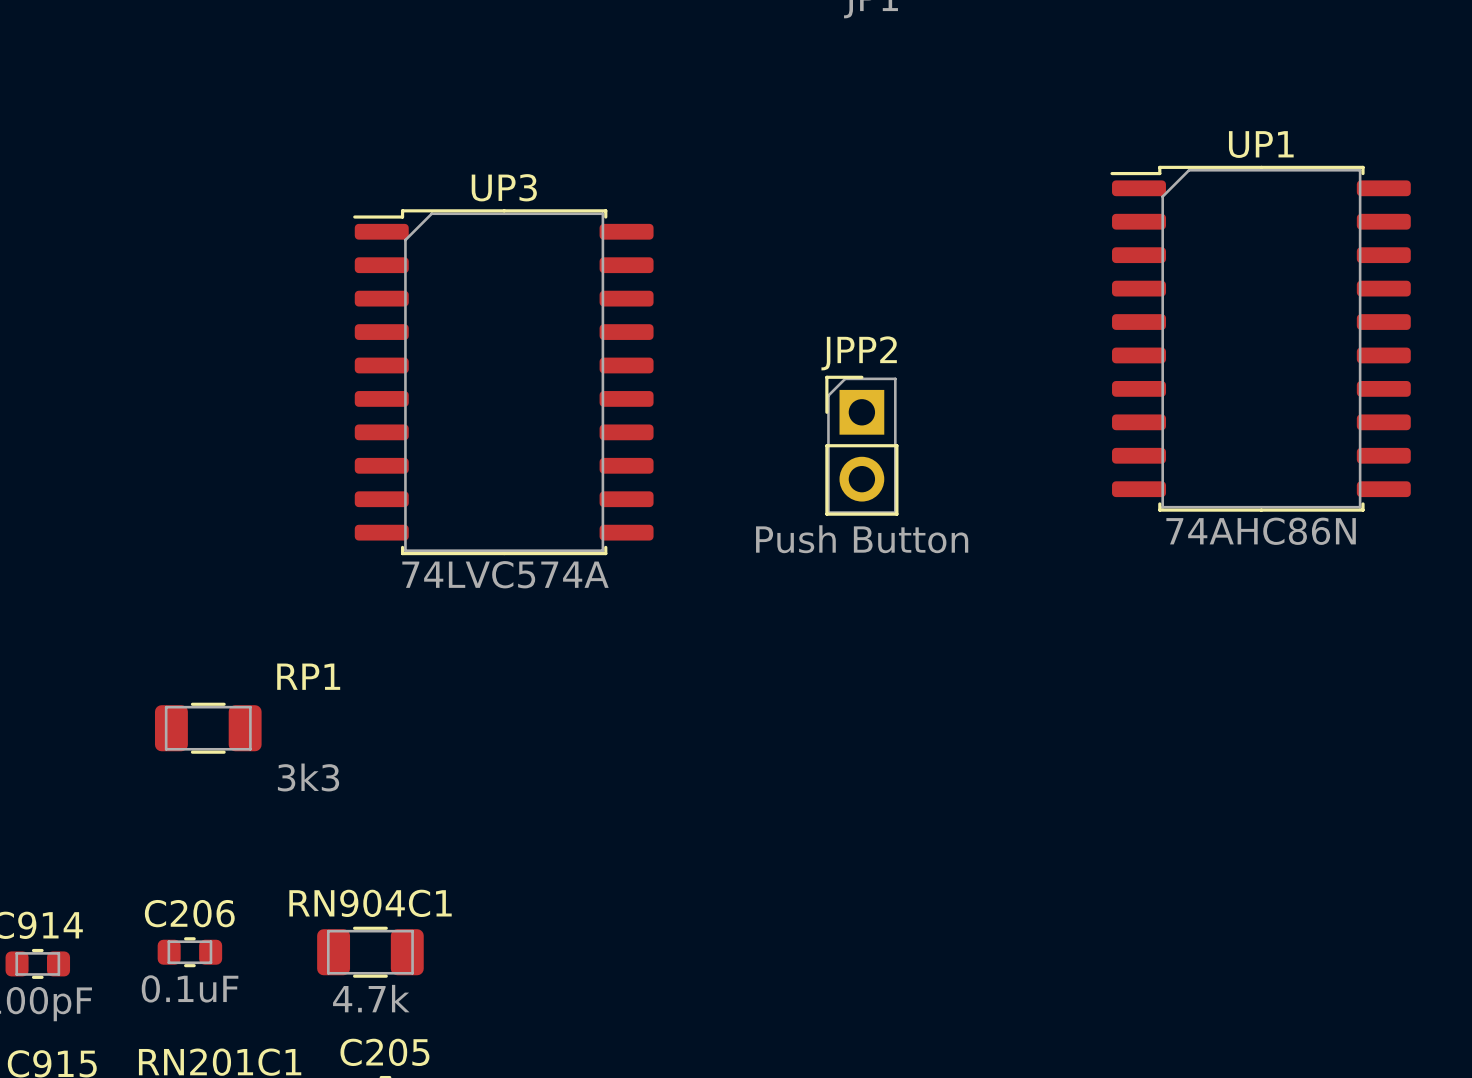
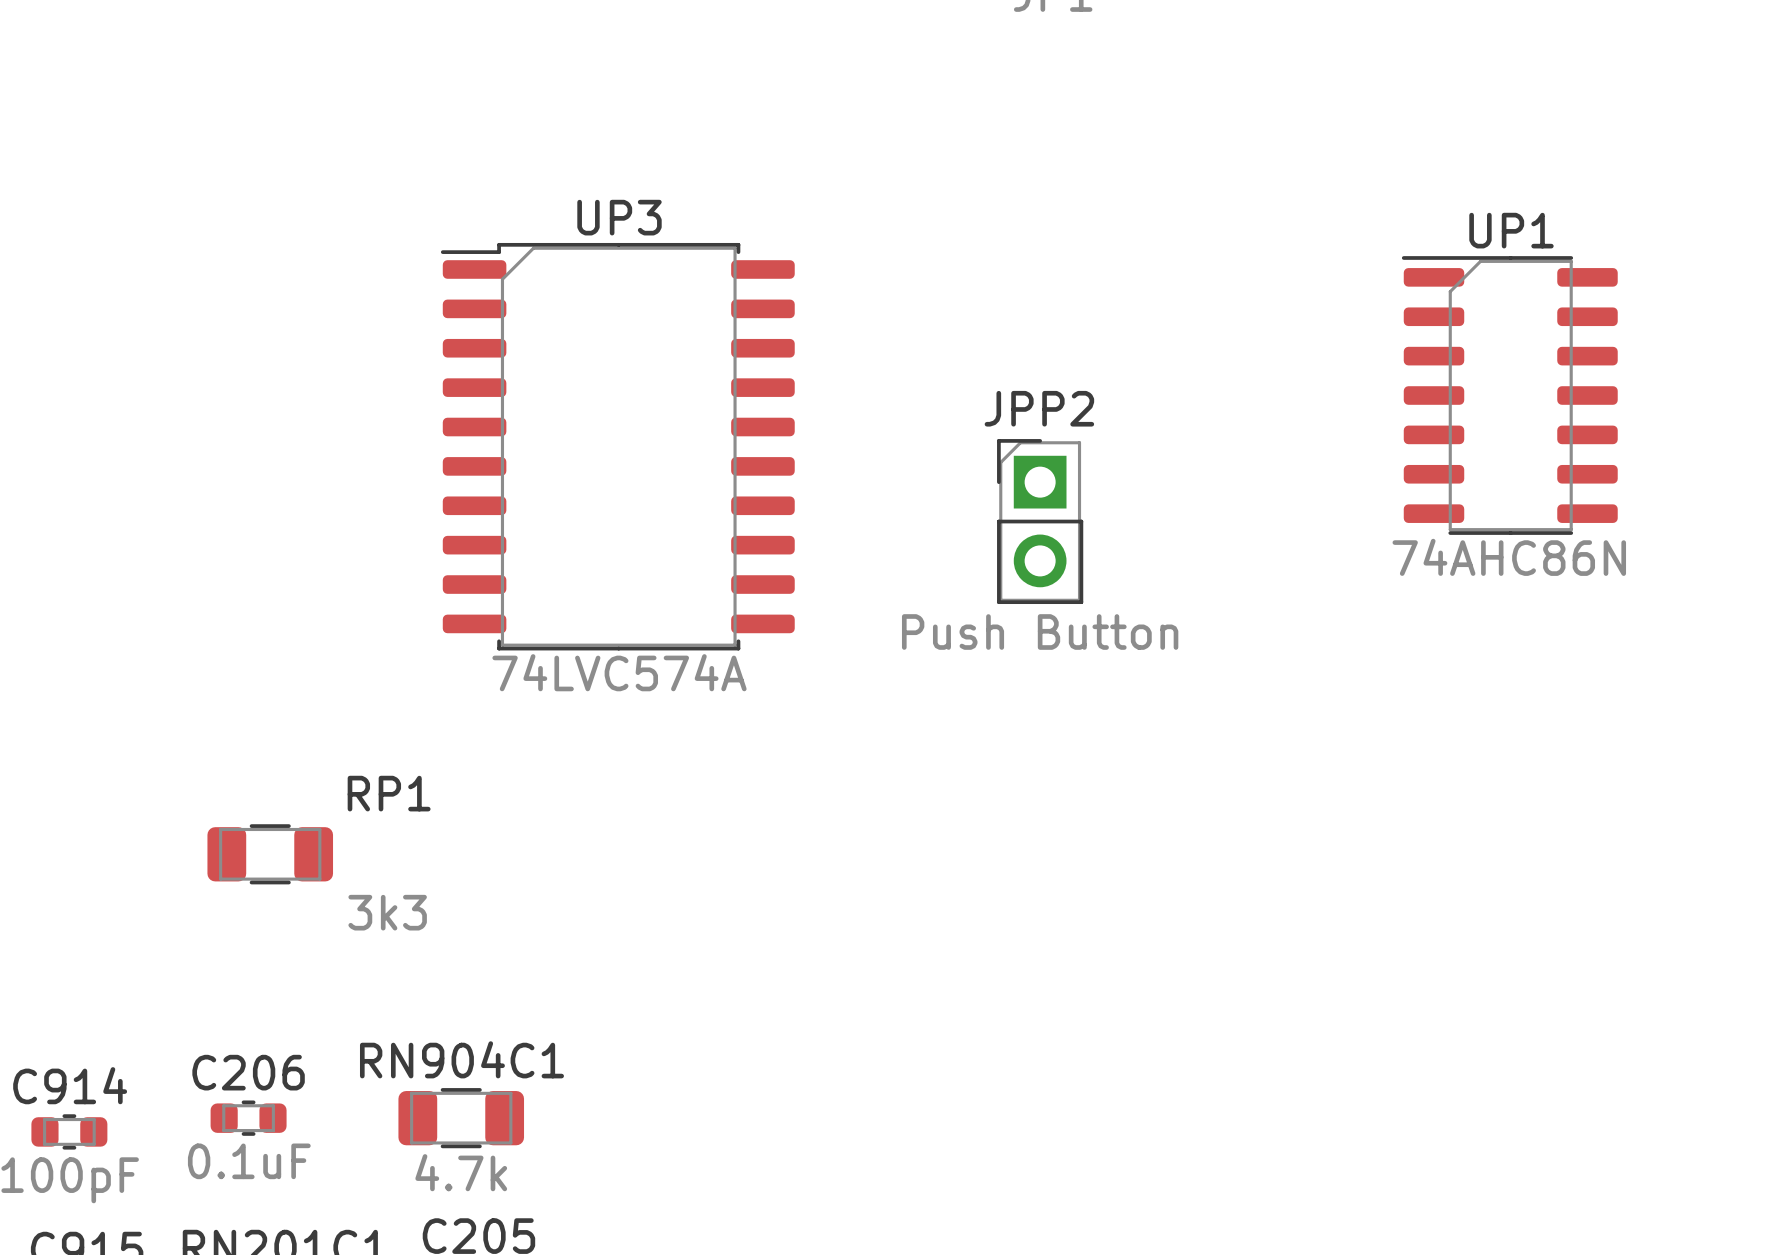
UP1 name position: UP1 (1261, 144) -> UP1 (1511, 230)
UP1 footprint: [1110, 165, 1411, 512] -> [1401, 256, 1618, 535]
UP1 value position: 74AHC86N (1261, 531) -> 74AHC86N (1509, 557)

